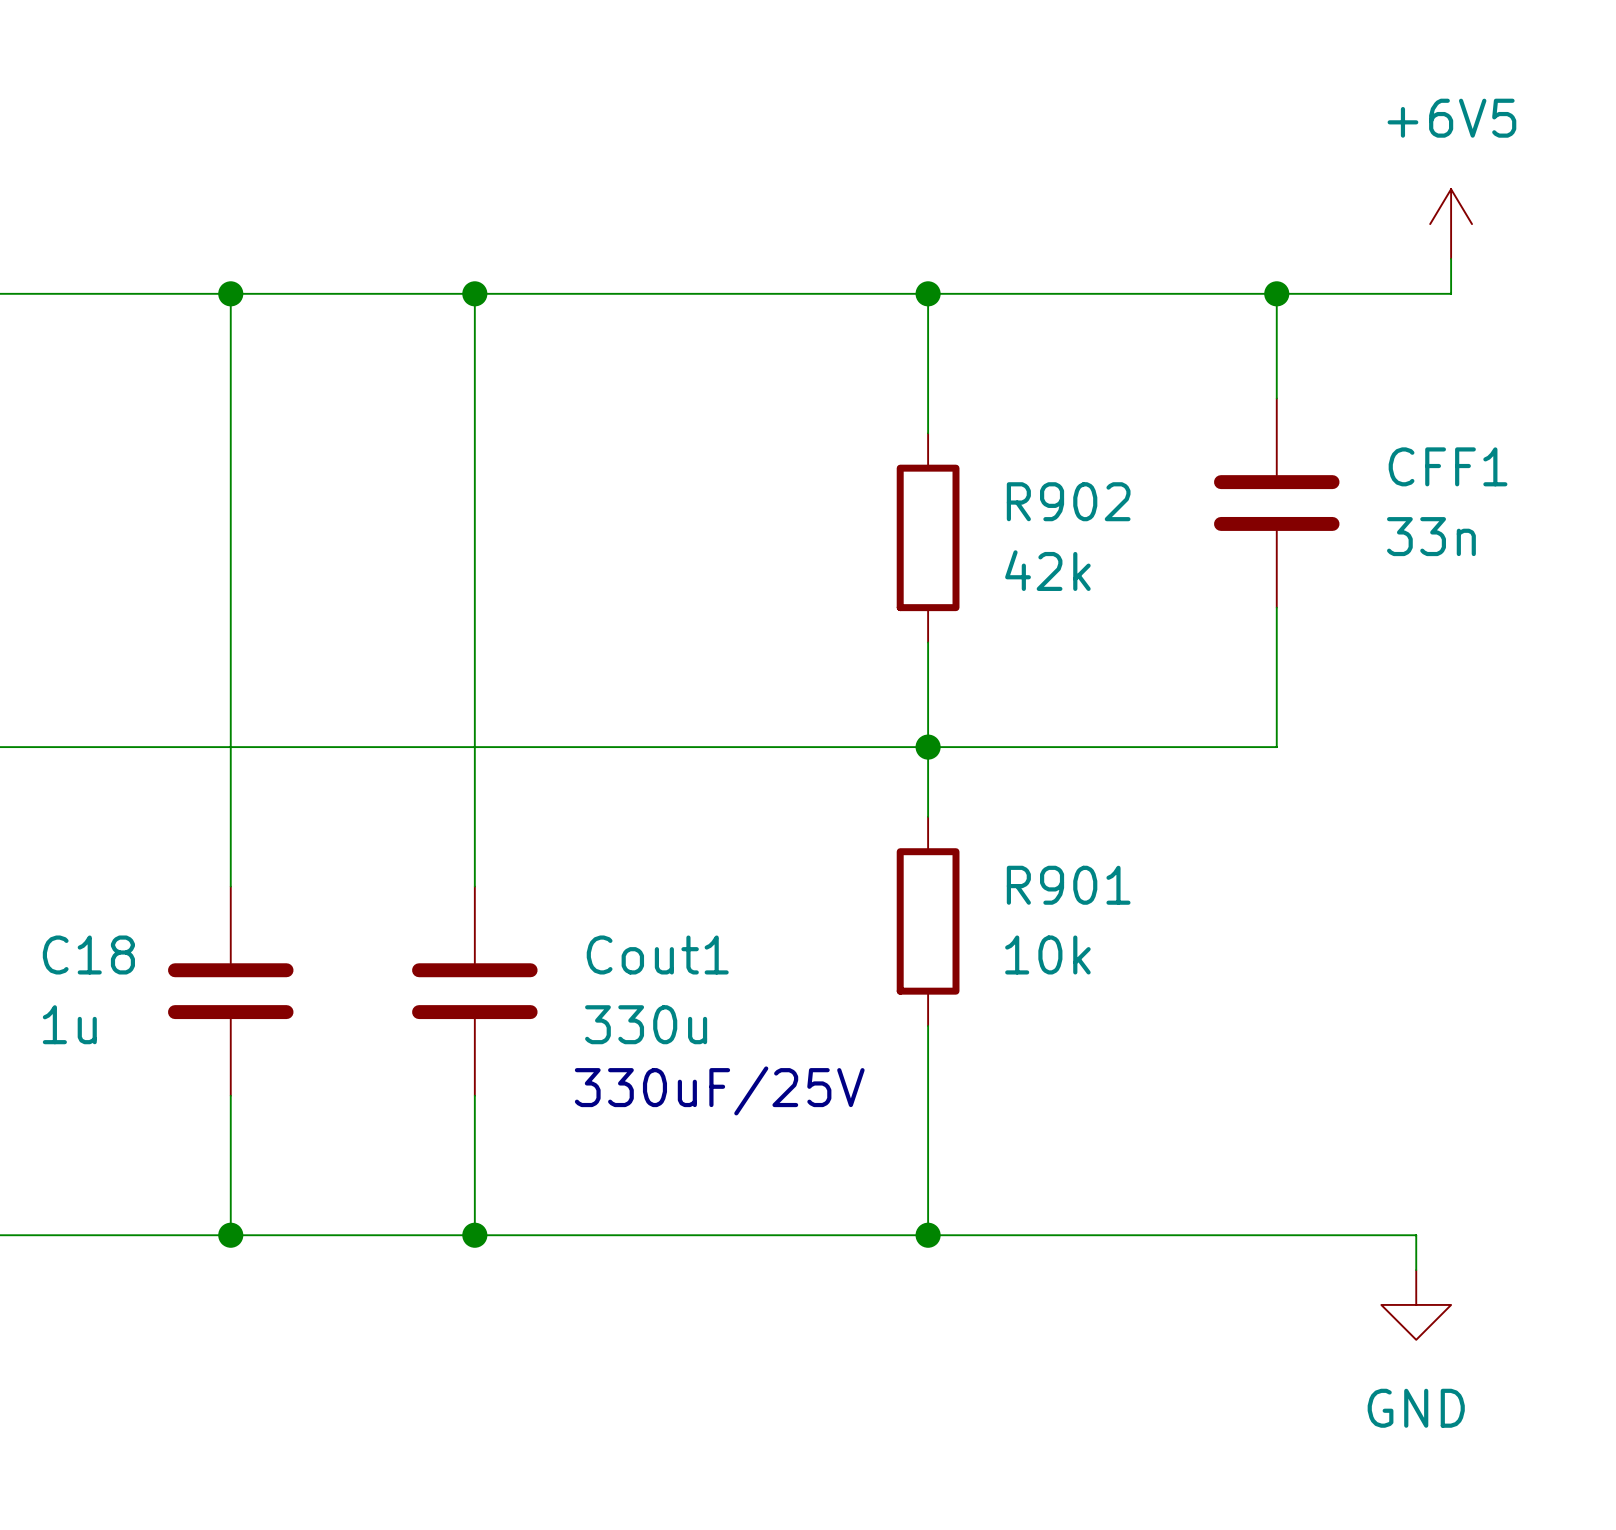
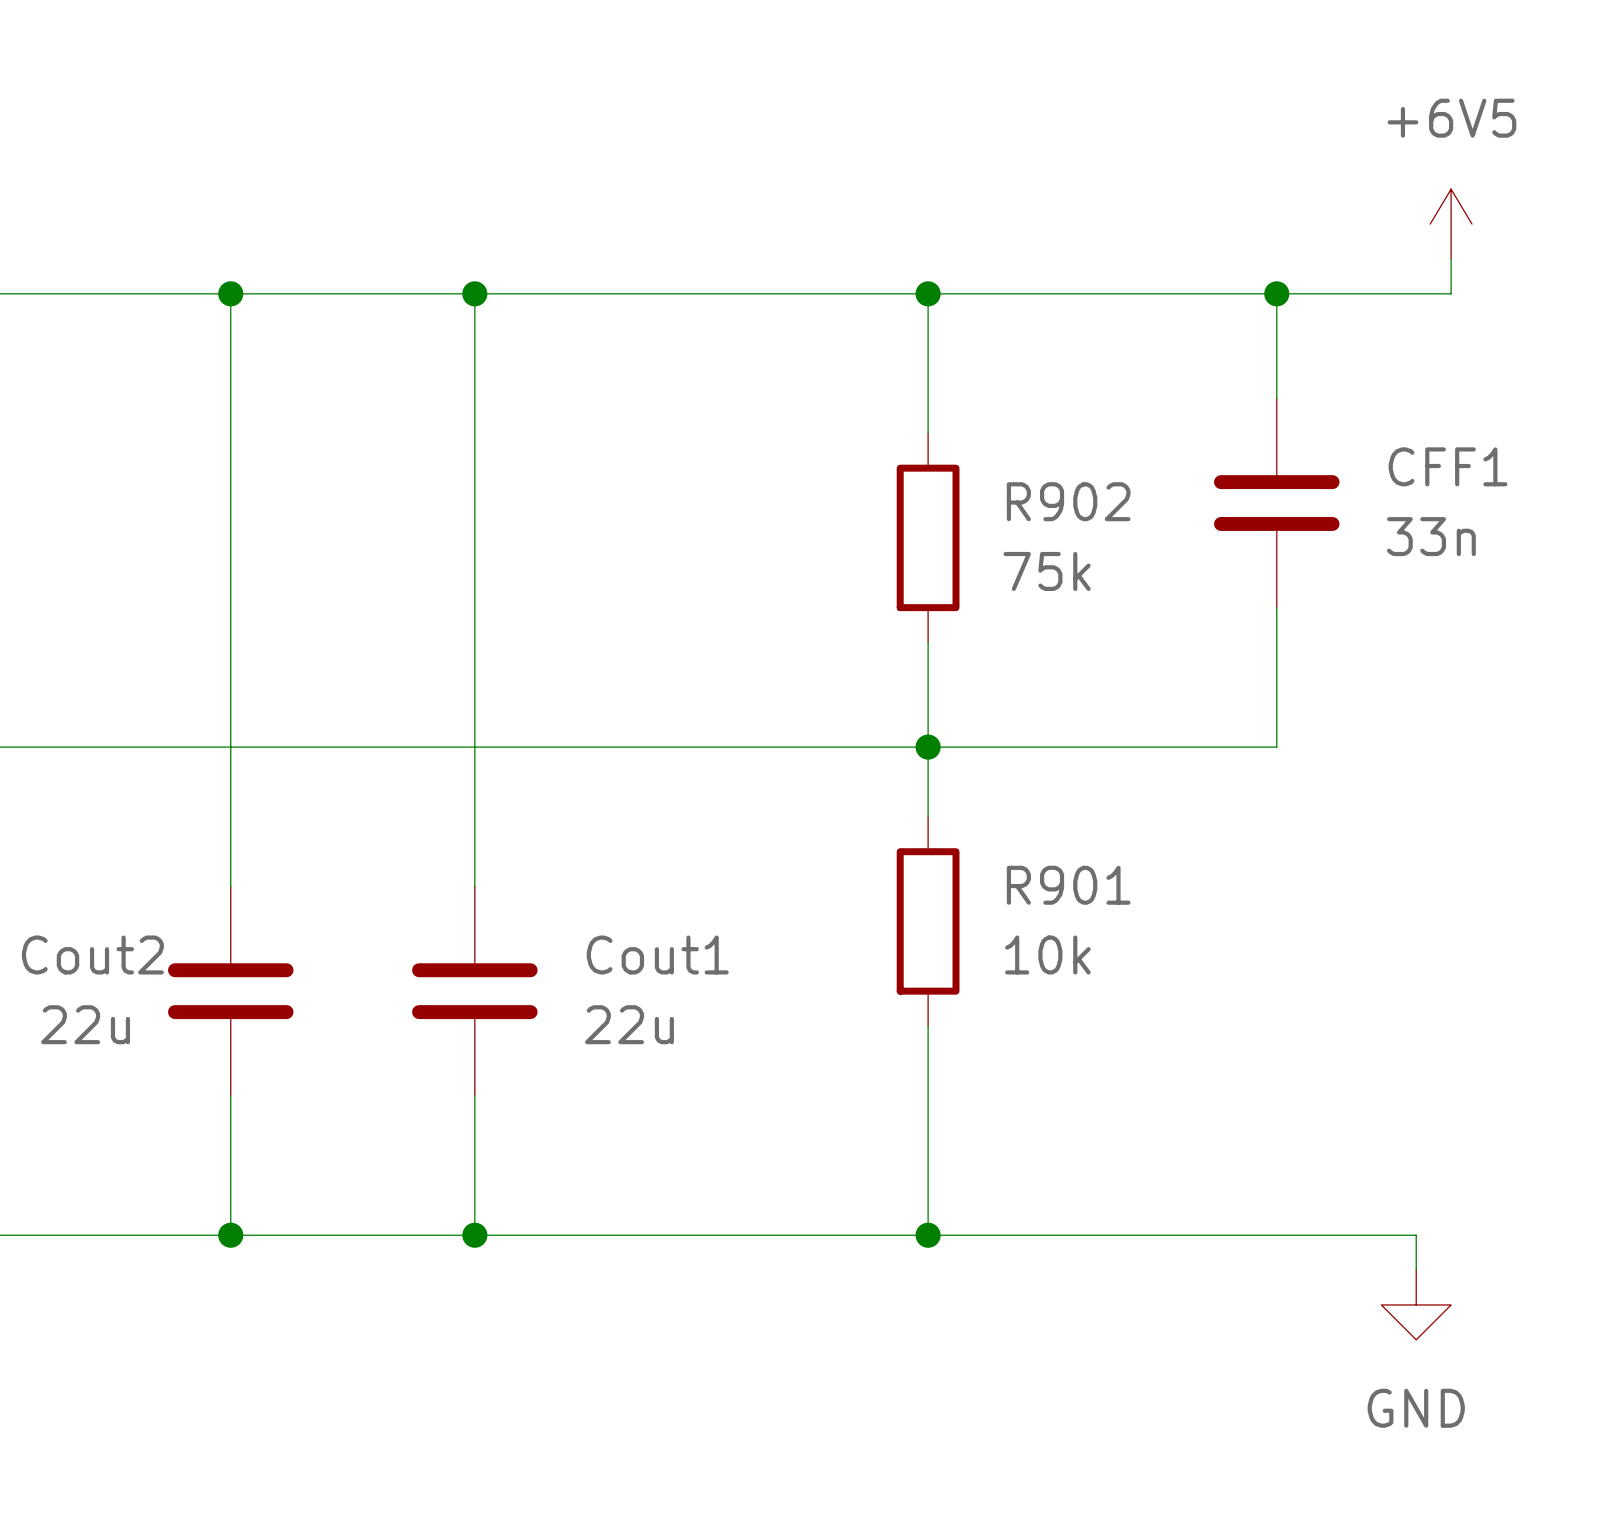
R902 value: 42k (1047, 570) -> 75k (1047, 571)
C18 name: C18 (88, 954) -> Cout2 (92, 954)
C18 value: 1u (69, 1024) -> 22u (85, 1024)
Cout1 value: 330u (646, 1024) -> 22u (629, 1024)
text: 330uF/25V (719, 1090) -> none

